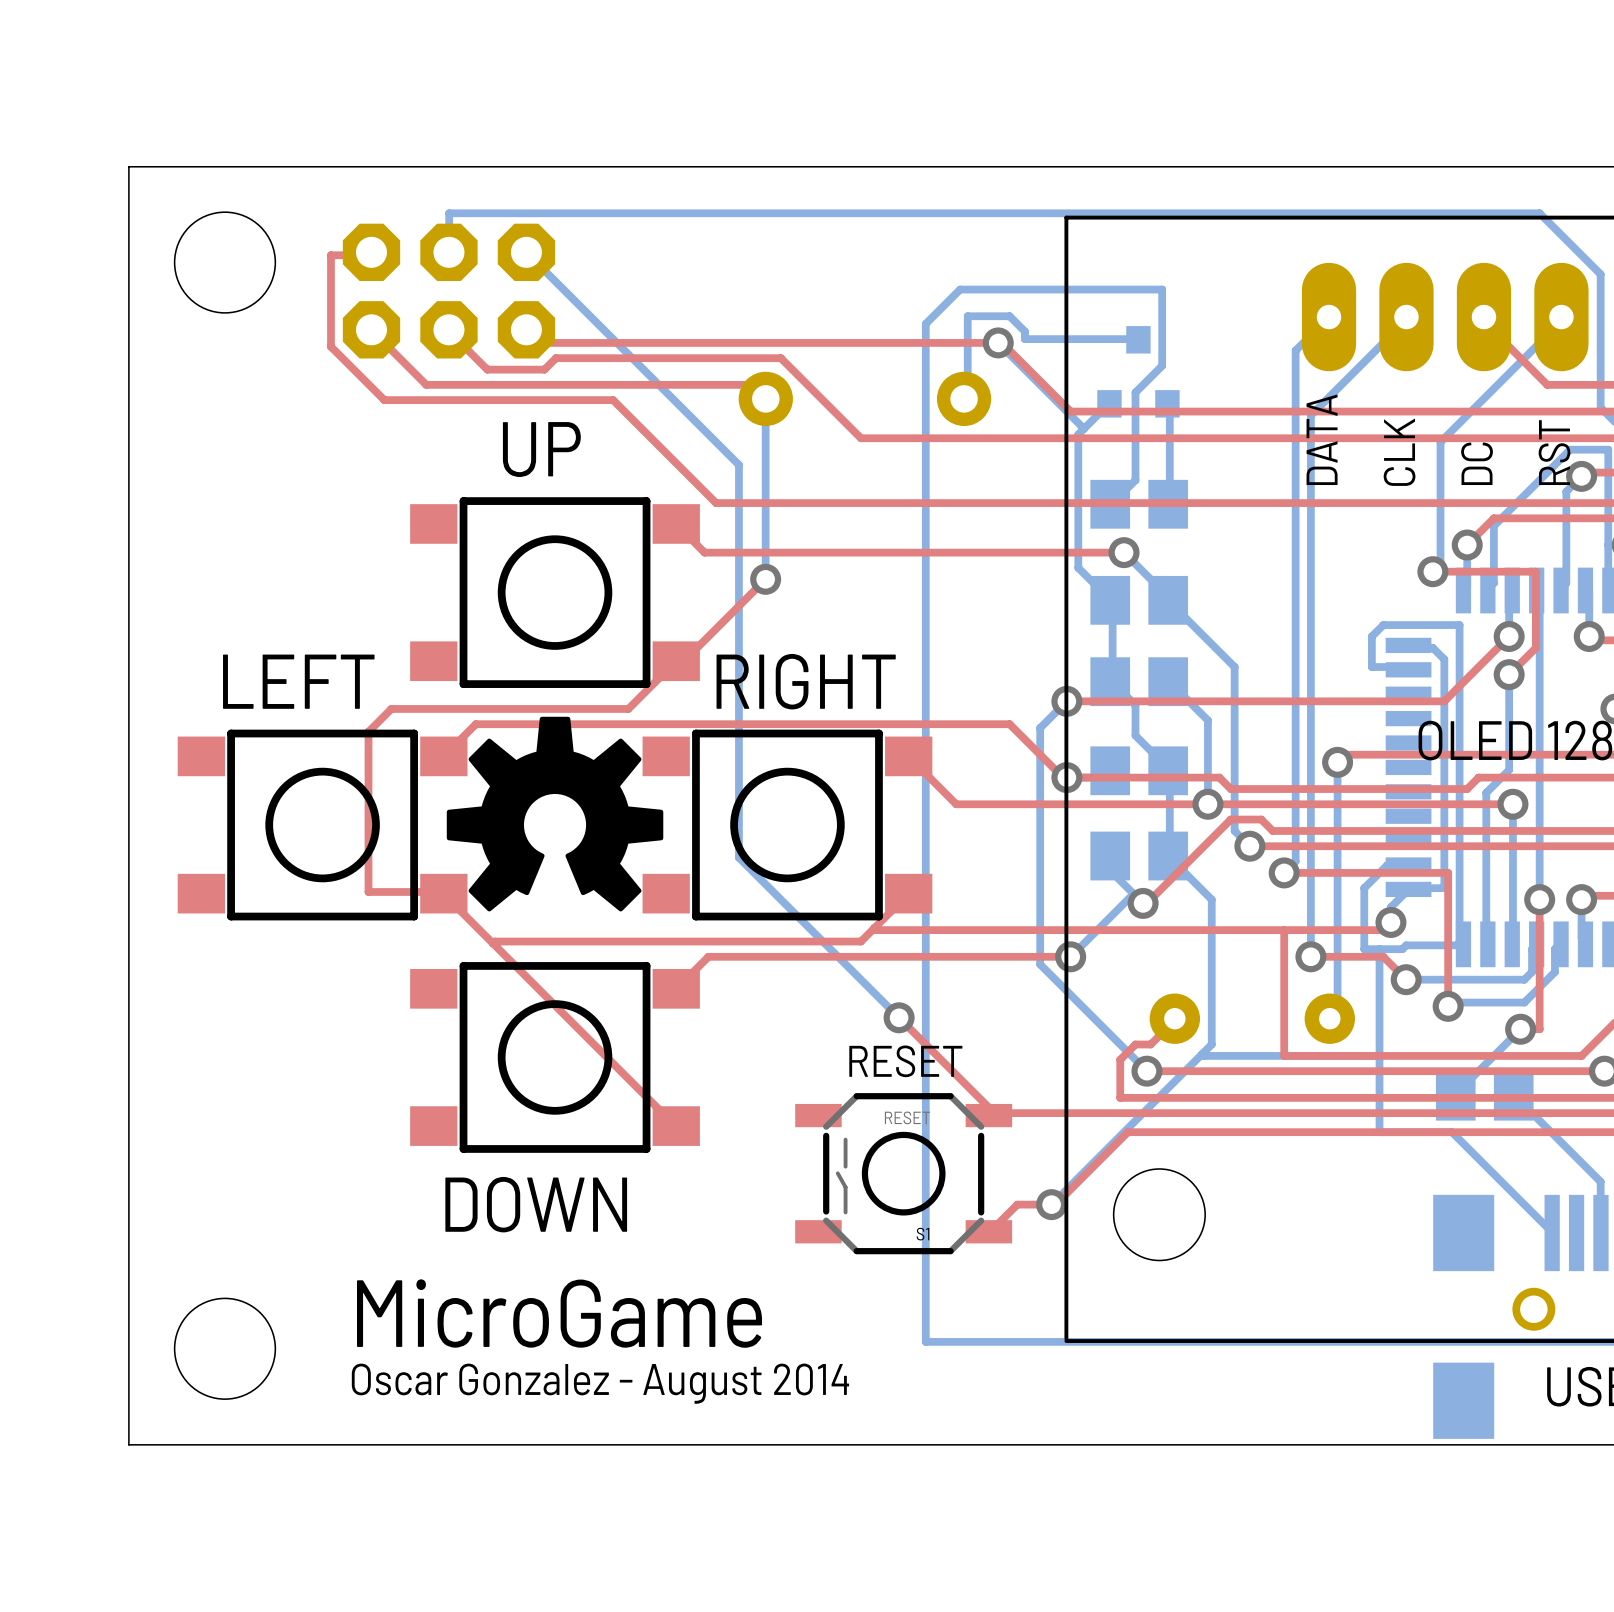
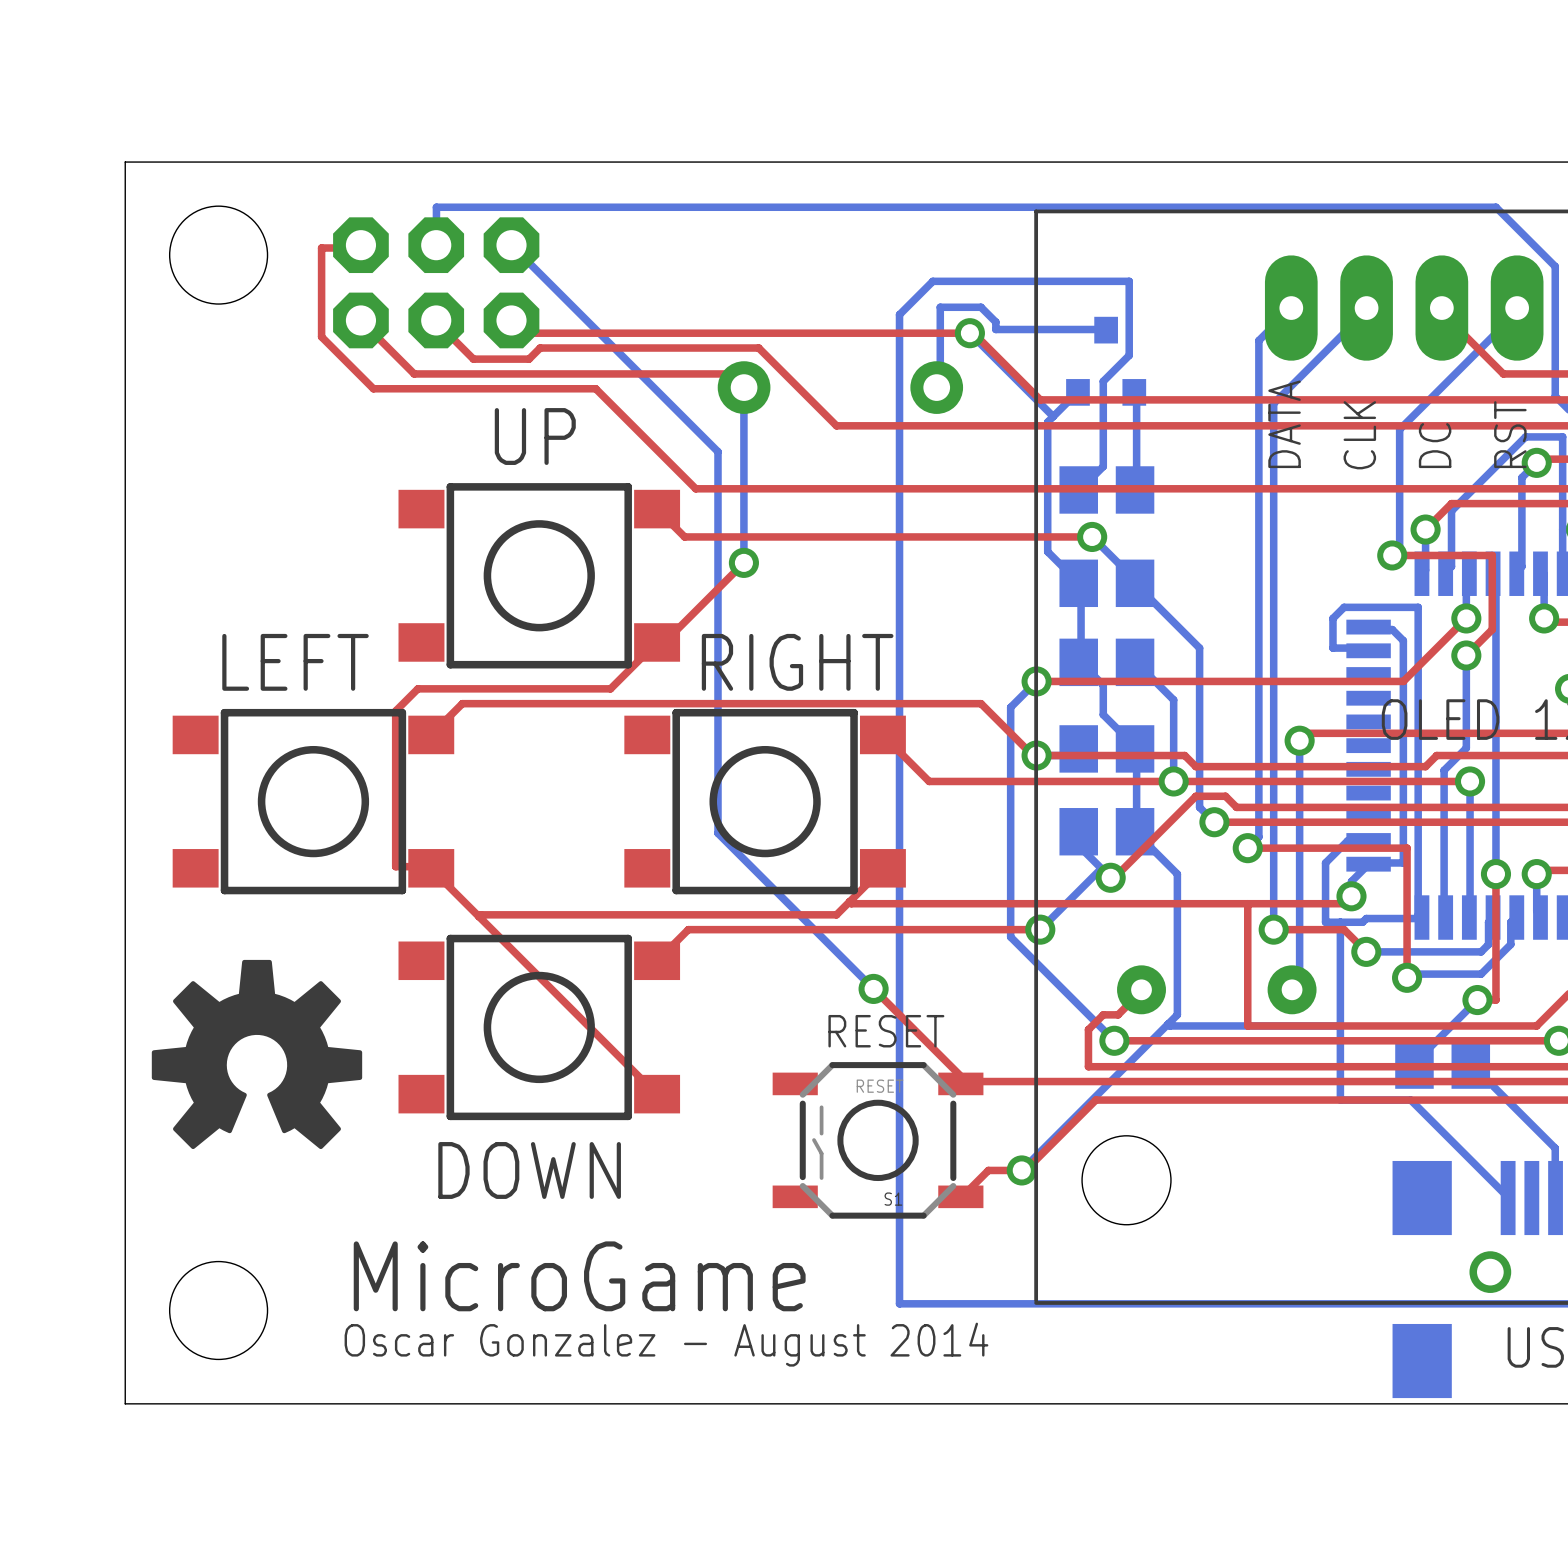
top track: (430, 708) (391, 708) (368, 731) (368, 891) (407, 891) -> (417, 688) (395, 711) (395, 866)
drawing position: (555, 814) -> (256, 1054)

